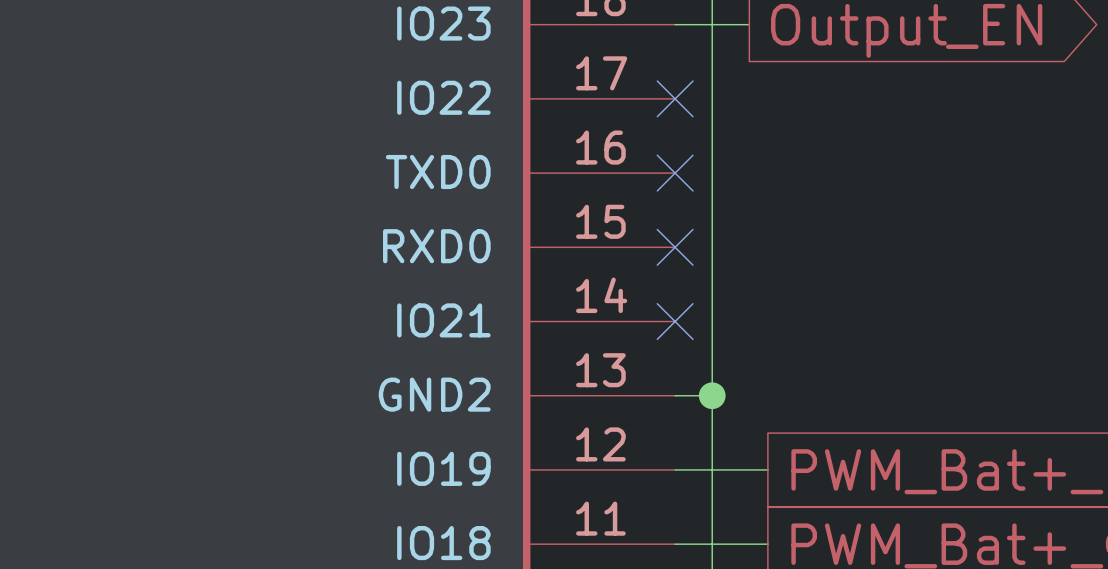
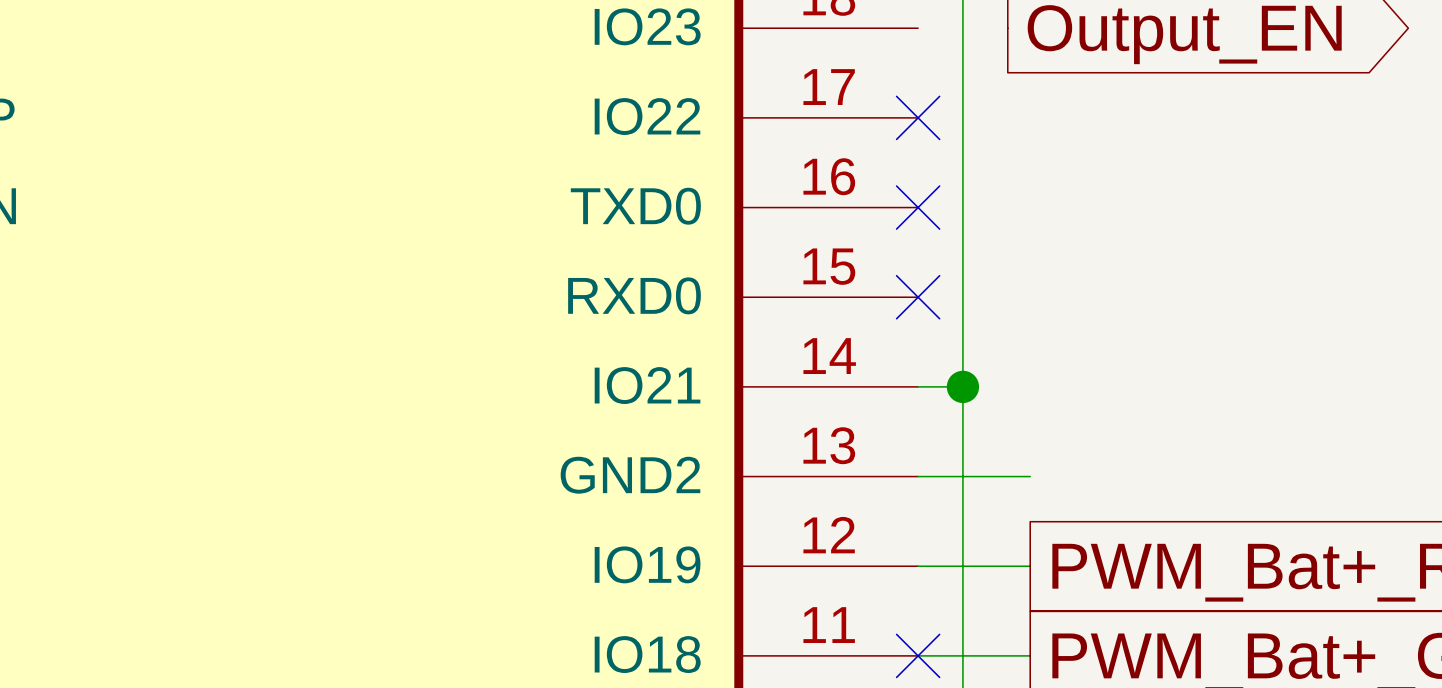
wire: (675, 24) (749, 24) -> none
wire: none -> (918, 386) (962, 386)
no-connect mark: (675, 321) -> none
wire: none -> (962, 476) (1030, 476)
junction position: (712, 395) -> (962, 386)
no-connect mark: none -> (918, 655)

